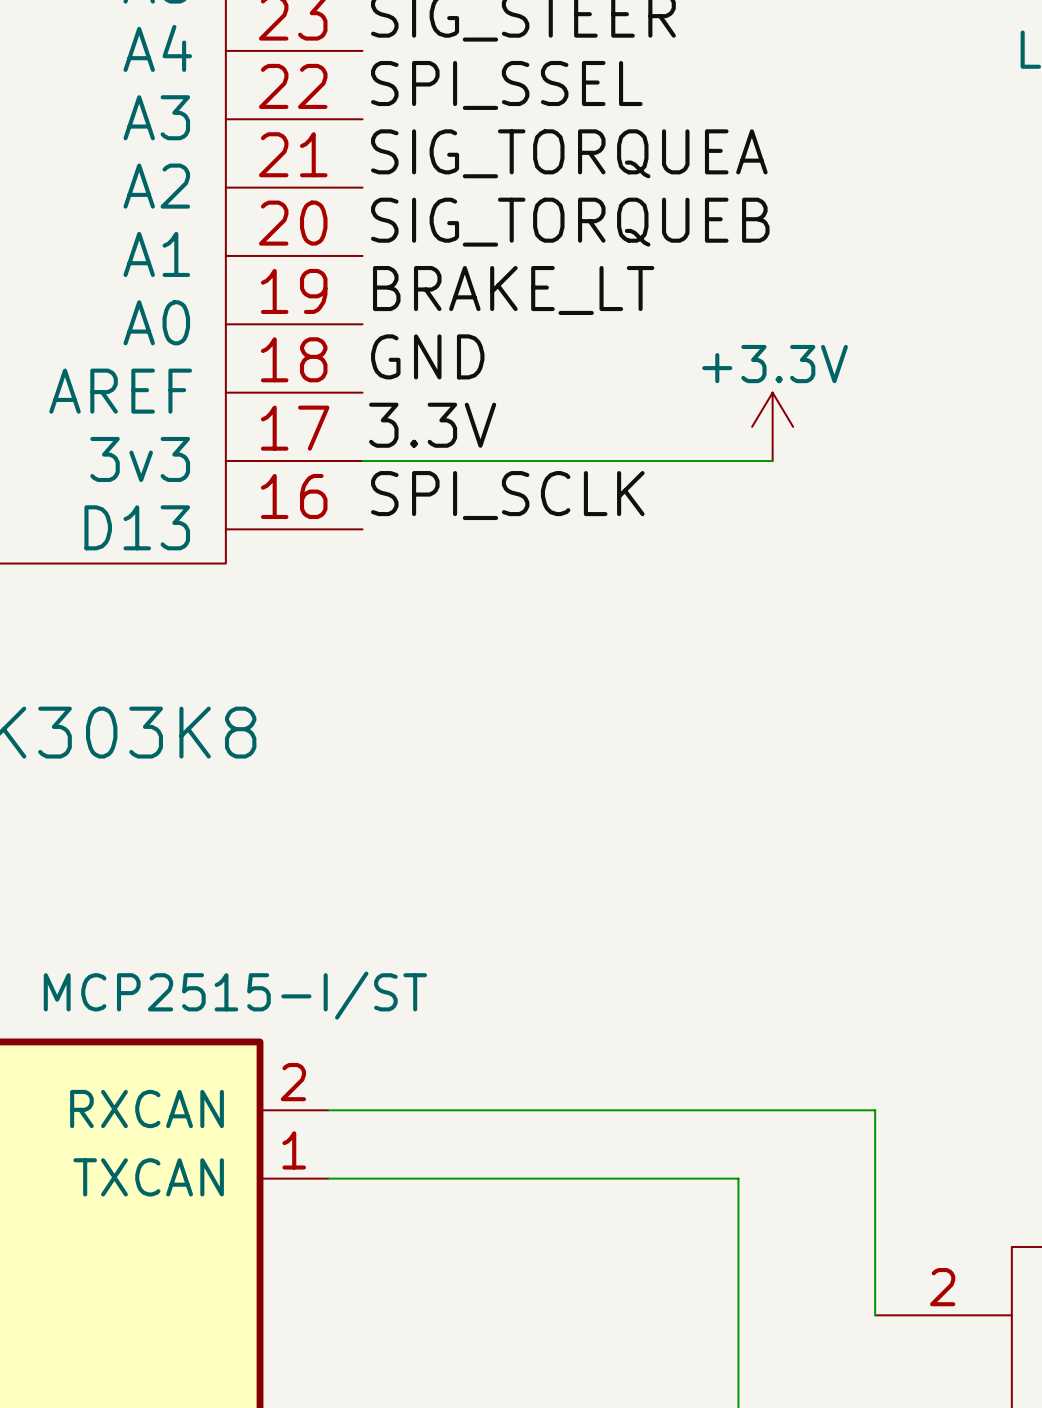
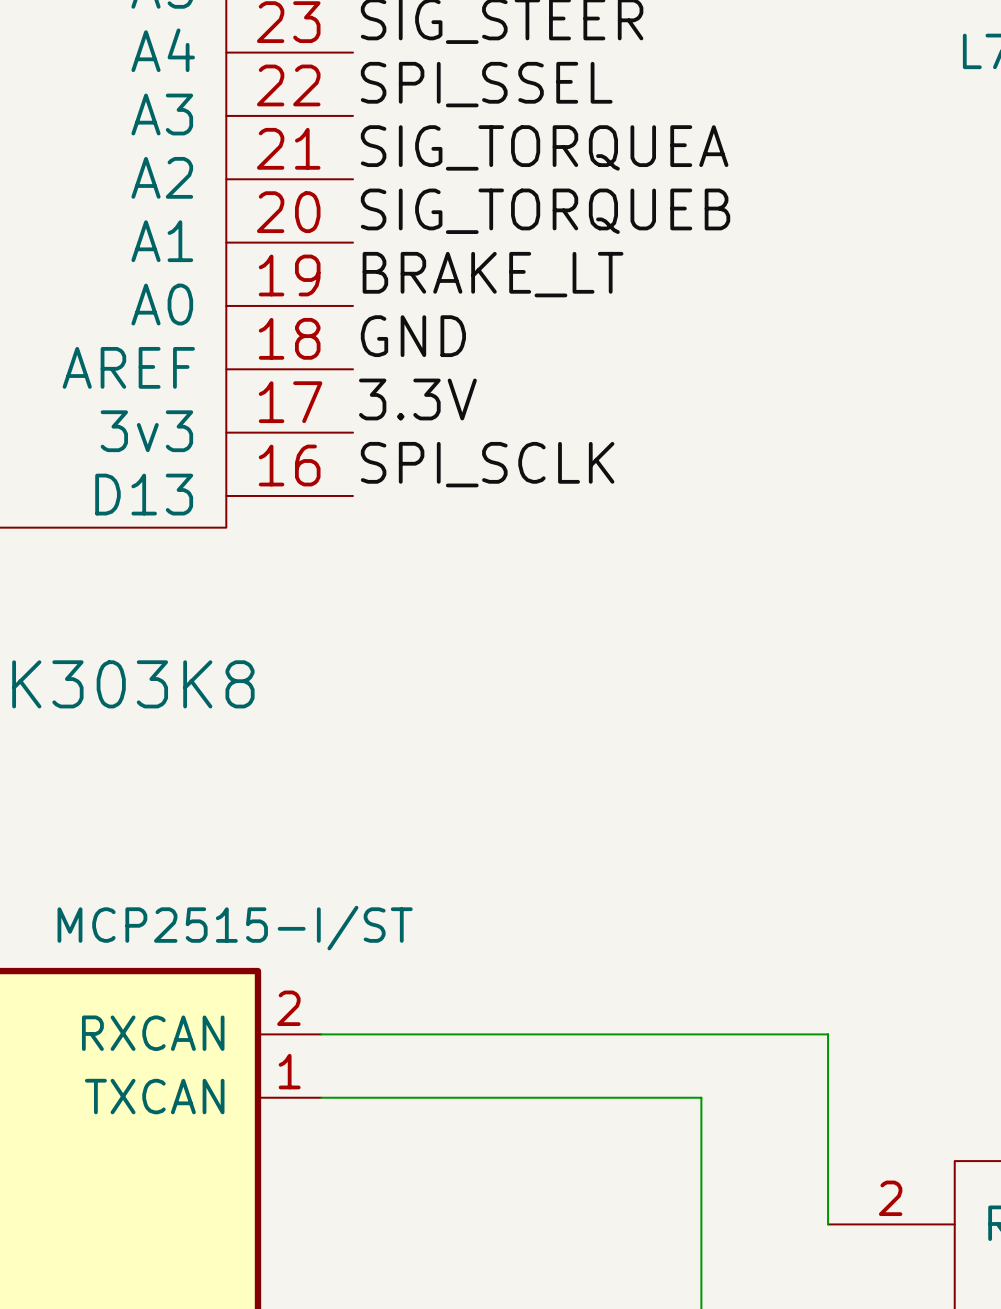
power symbol: +3.3V (772, 426) -> none
wire: (362, 461) (772, 461) -> none

